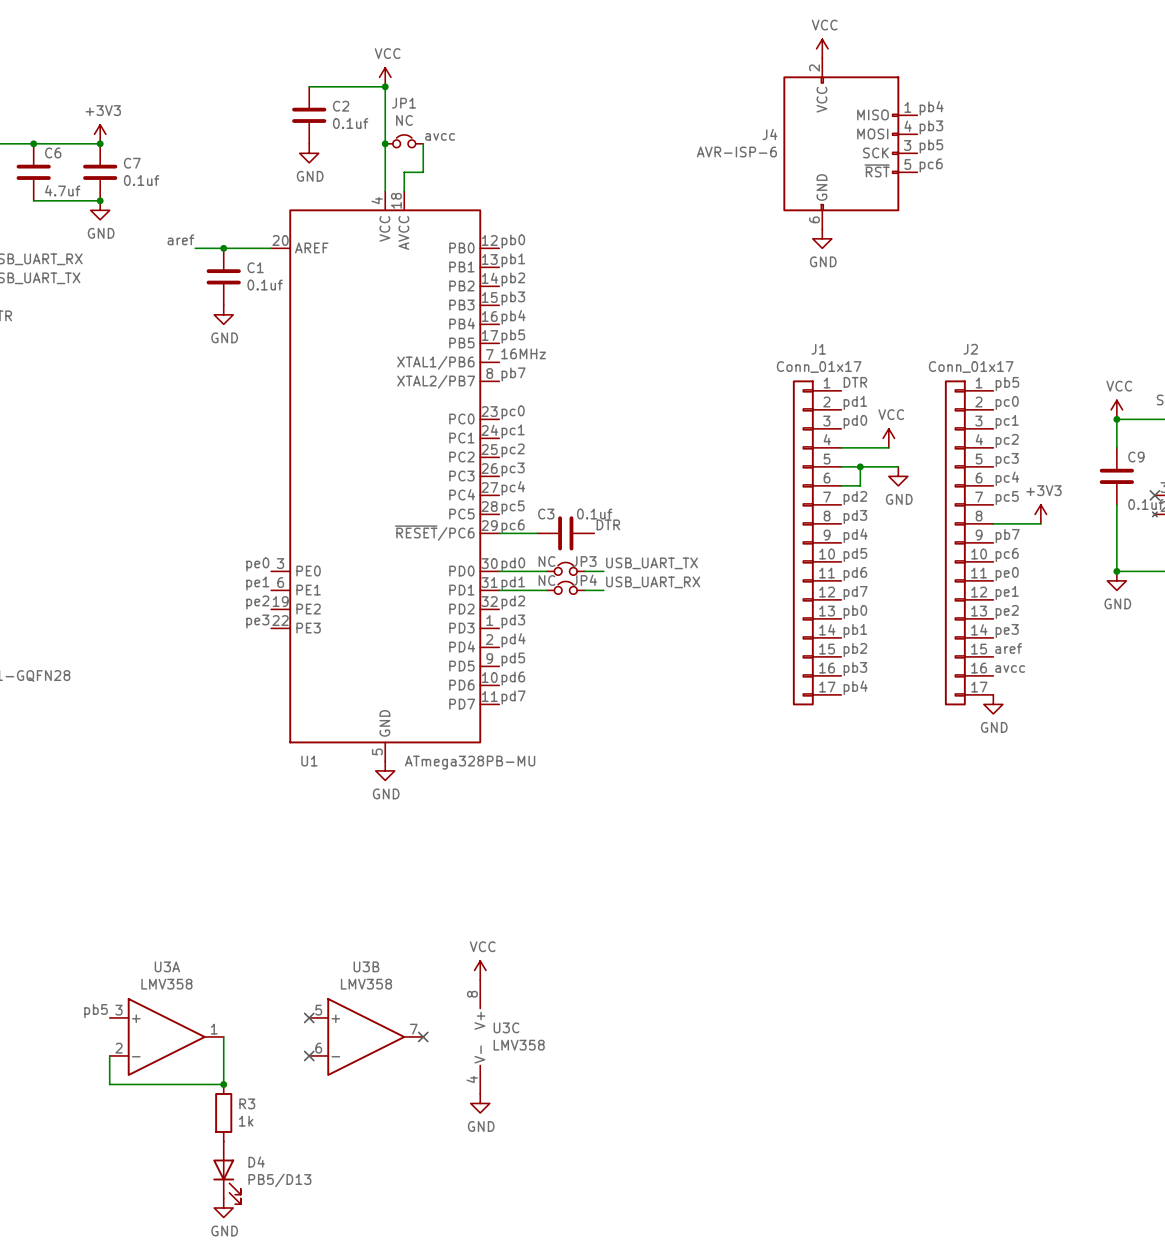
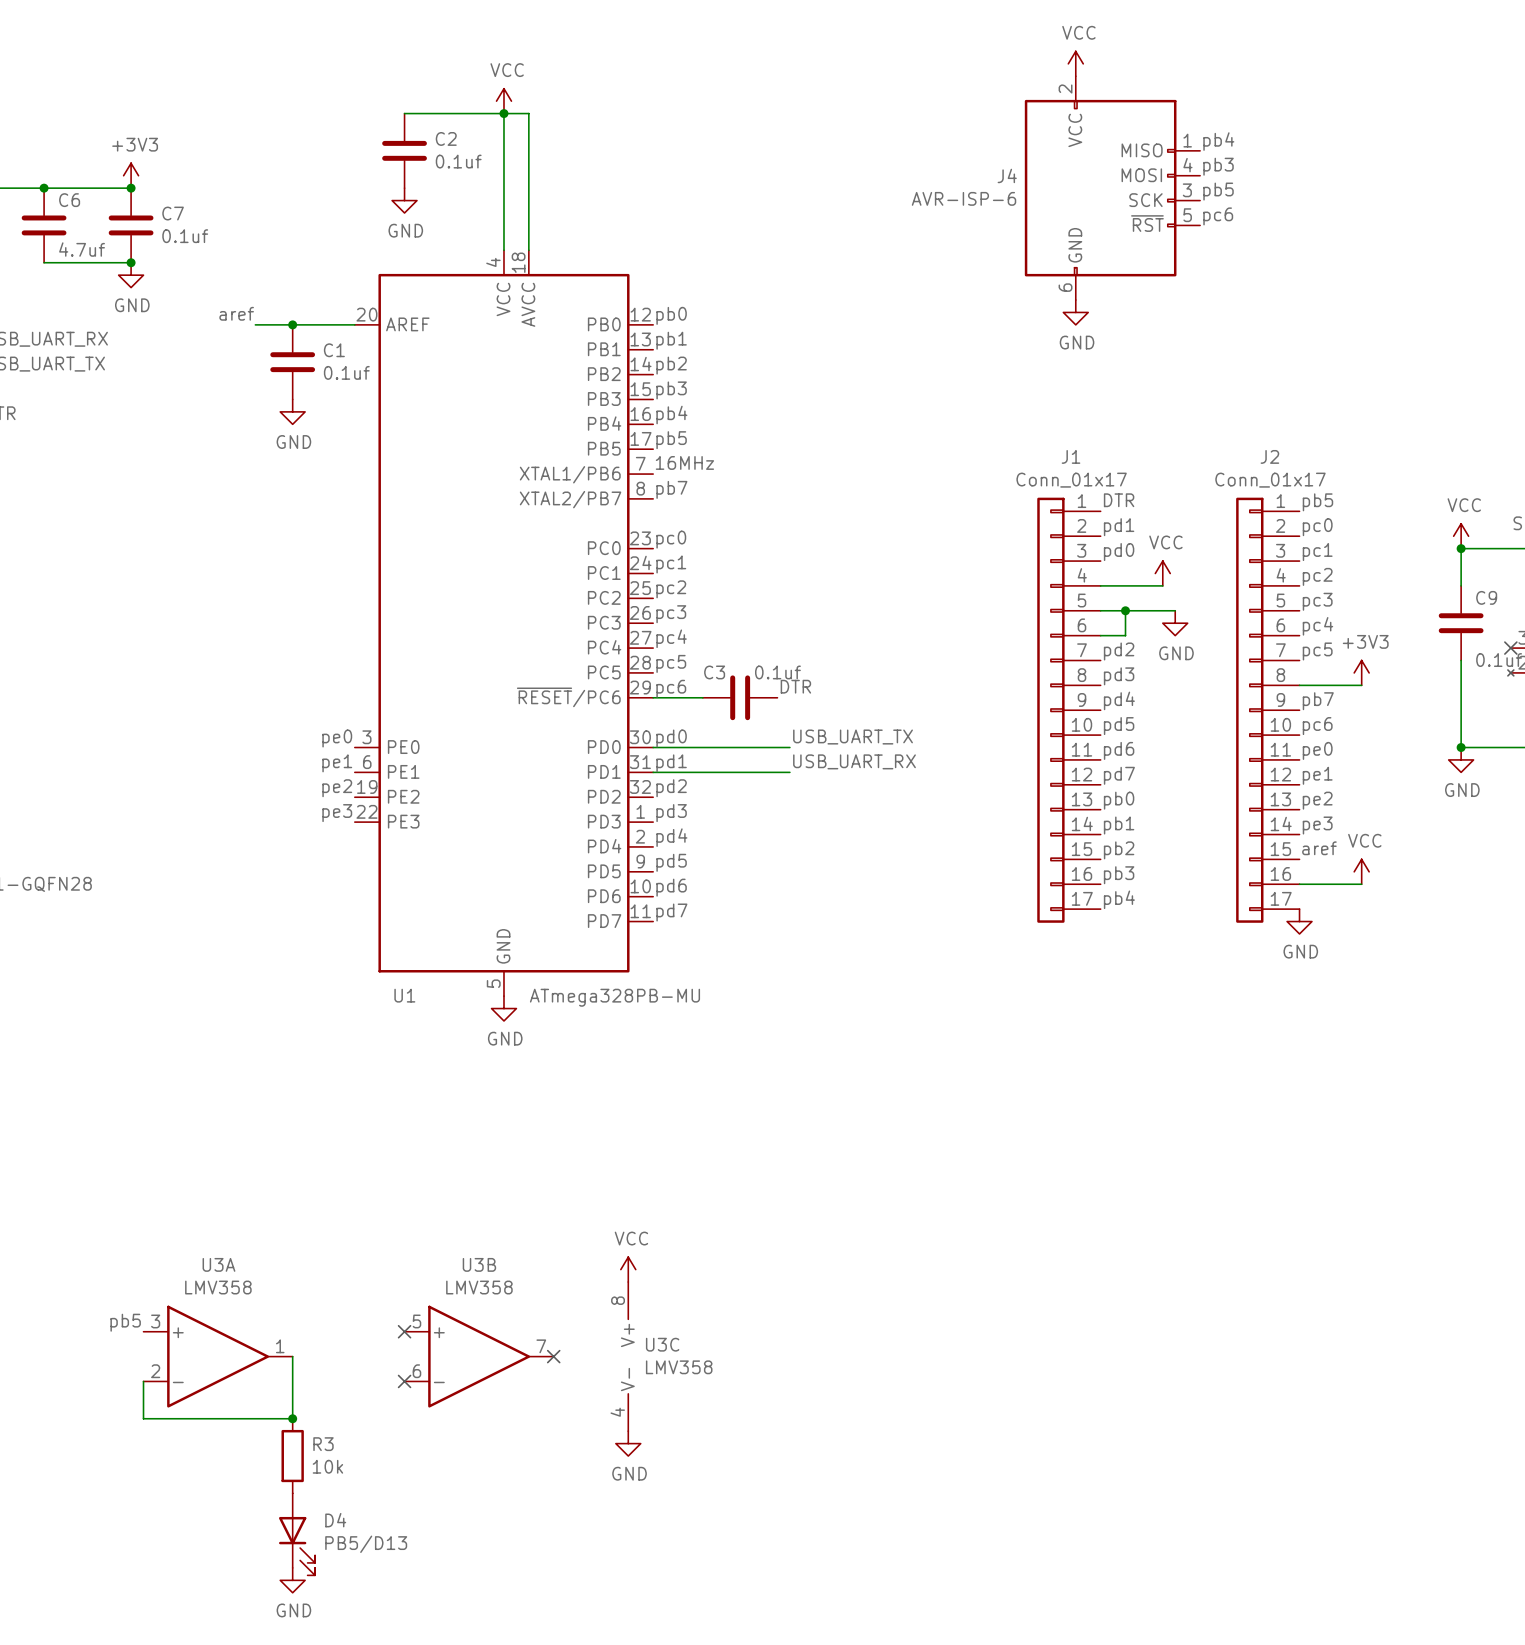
label: avcc (440, 136) -> none
JP1: NC (404, 141) -> none
junction: (385, 143) -> none
wire: (423, 143) (423, 172) (404, 172) -> (503, 113) (528, 113) (528, 225)
JP3: NC (565, 568) -> none
wire: none -> (715, 747) (765, 747)
JP4: NC (565, 587) -> none
wire: none -> (715, 772) (765, 772)
power symbol: none -> VCC (1361, 871)
label: avcc (1010, 669) -> none
wire: none -> (1299, 884) (1361, 884)
R3 value: 1k (246, 1121) -> 10k (327, 1466)

